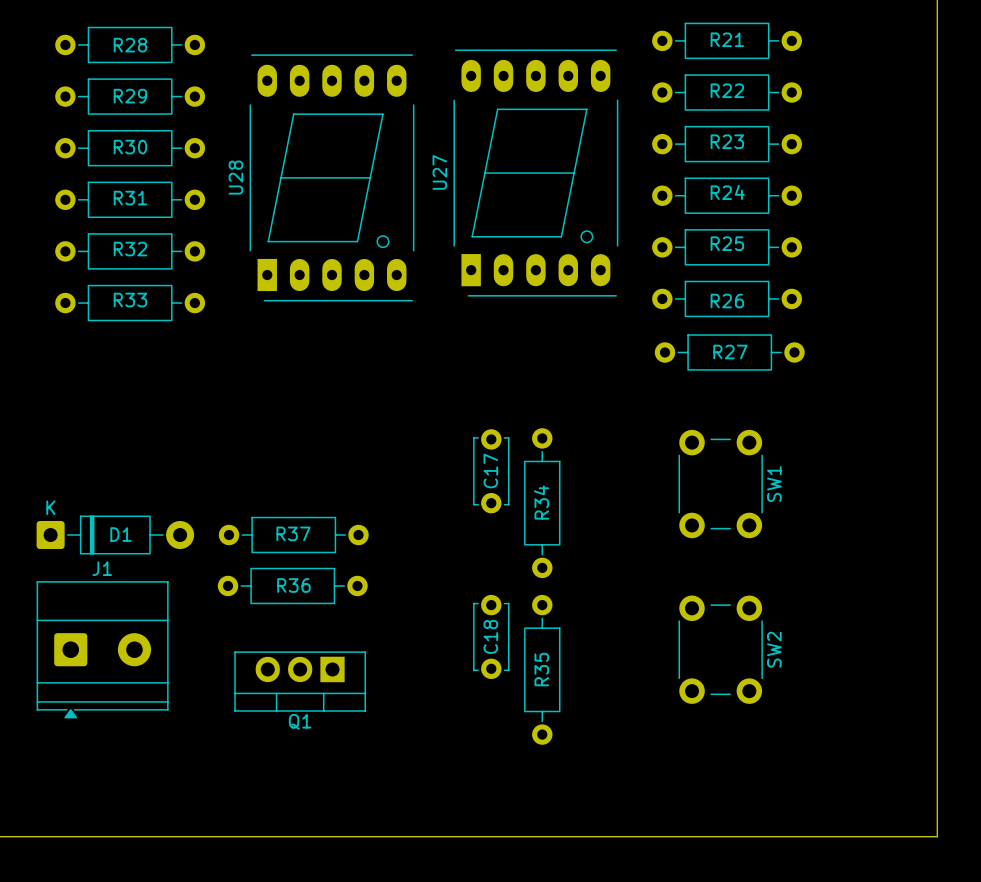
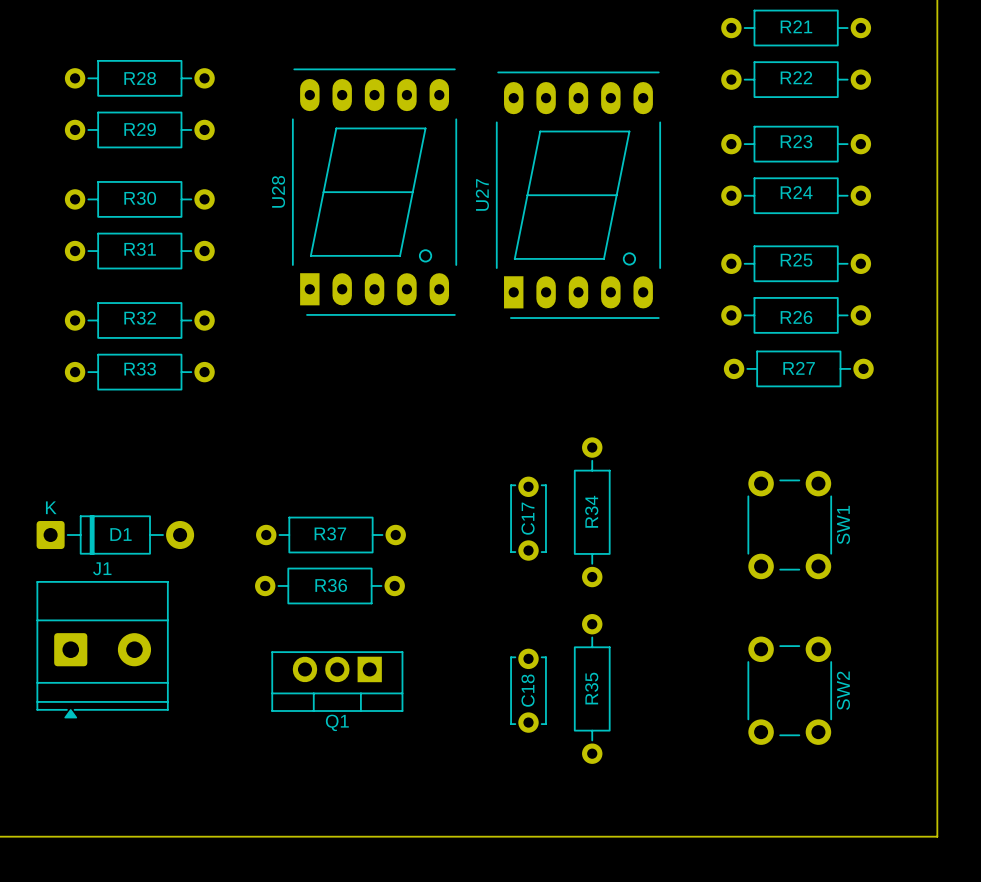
R21 position: (727, 40) -> (796, 28)
R28 position: (130, 44) -> (139, 78)
R22 position: (727, 92) -> (796, 79)
R29 position: (130, 96) -> (139, 129)
R23 position: (727, 144) -> (796, 144)
R30 position: (130, 148) -> (139, 199)
U27 position: (535, 173) -> (578, 195)
U28 position: (332, 177) -> (374, 192)
R24 position: (727, 195) -> (796, 195)
R31 position: (130, 199) -> (139, 251)
R25 position: (727, 247) -> (796, 263)
R32 position: (130, 251) -> (139, 320)
R26 position: (727, 298) -> (796, 315)
R33 position: (130, 303) -> (139, 372)
R27 position: (729, 352) -> (798, 368)
C17 position: (491, 471) -> (528, 518)
SW1 position: (720, 484) -> (789, 525)
R34 position: (542, 503) -> (592, 512)
R37 position: (293, 535) -> (330, 535)
R36 position: (292, 585) -> (329, 585)
C18 position: (491, 636) -> (528, 690)
SW2 position: (720, 649) -> (789, 690)
R35 position: (542, 669) -> (592, 688)
Q1 position: (300, 681) -> (337, 681)

